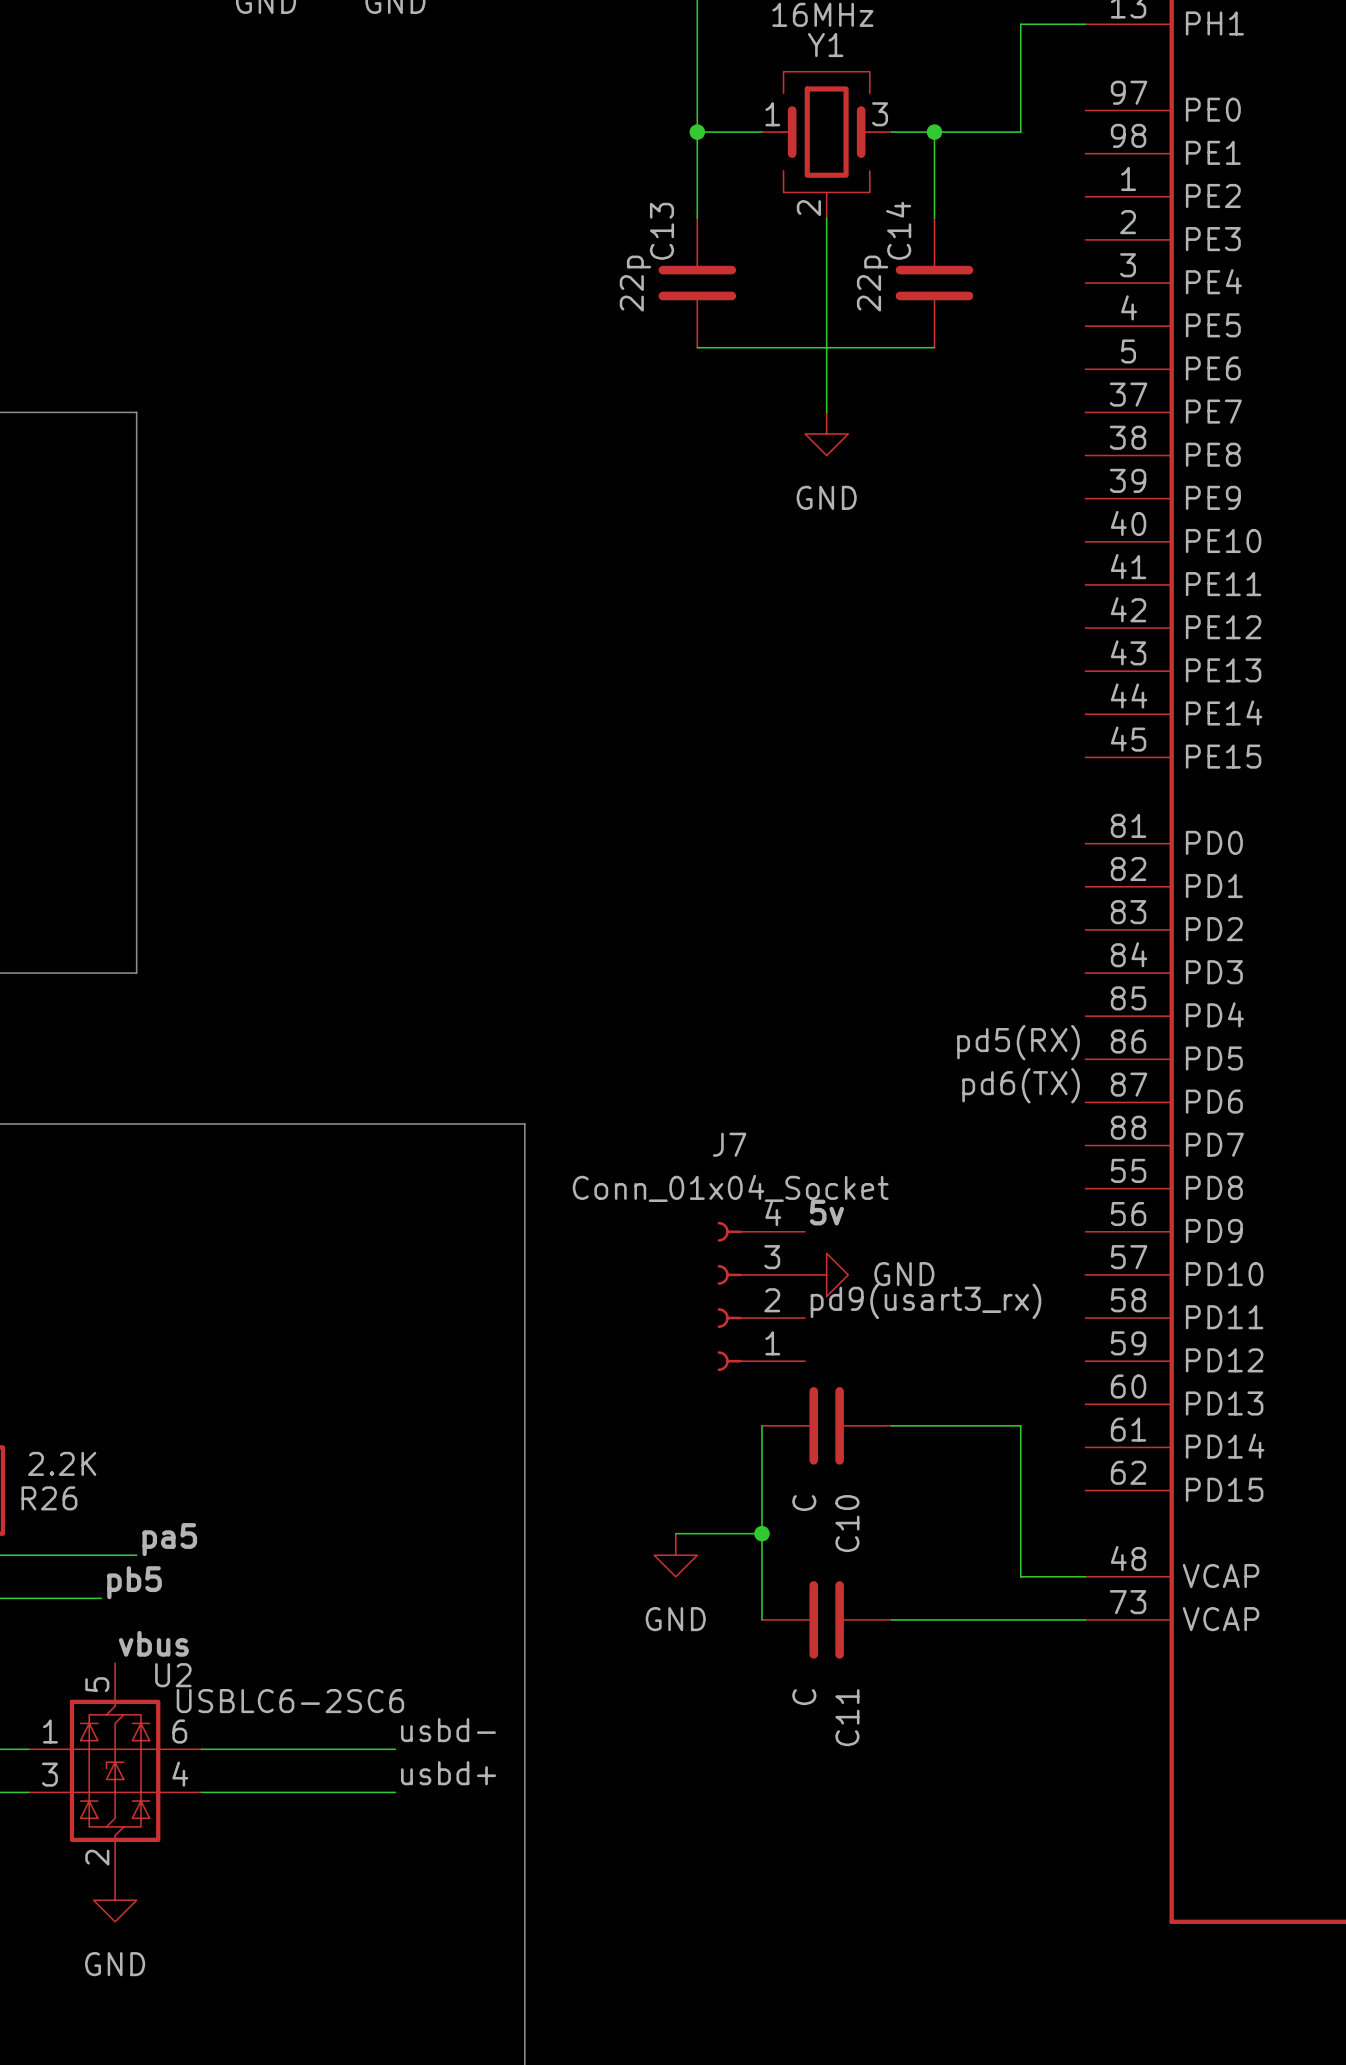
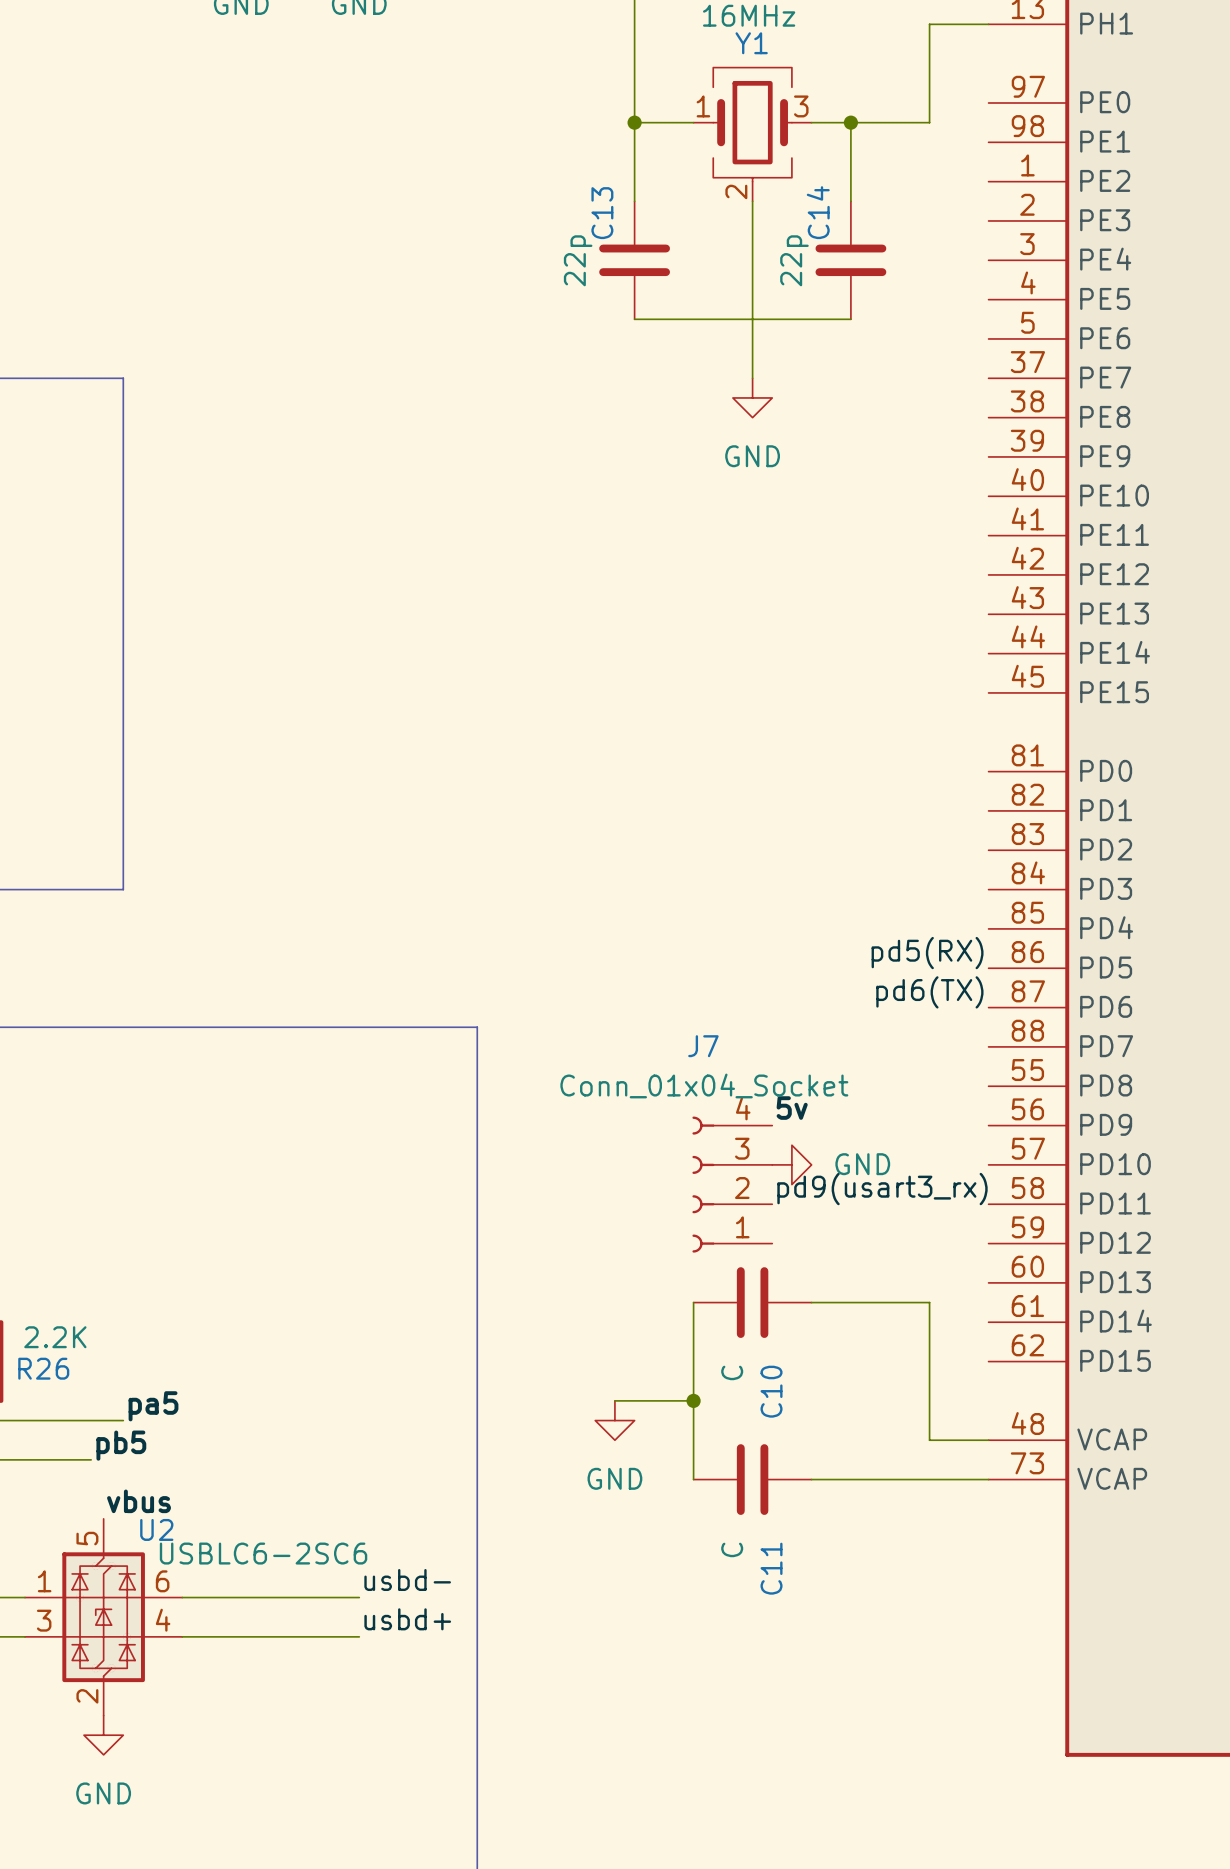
label position: 5v (826, 1212) -> 5v (792, 1108)
power symbol position: GND (826, 1274) -> GND (791, 1164)
J7 position: (761, 1296) -> (732, 1184)
label position: pd9(usart3_rx) (925, 1301) -> pd9(usart3_rx) (882, 1189)

